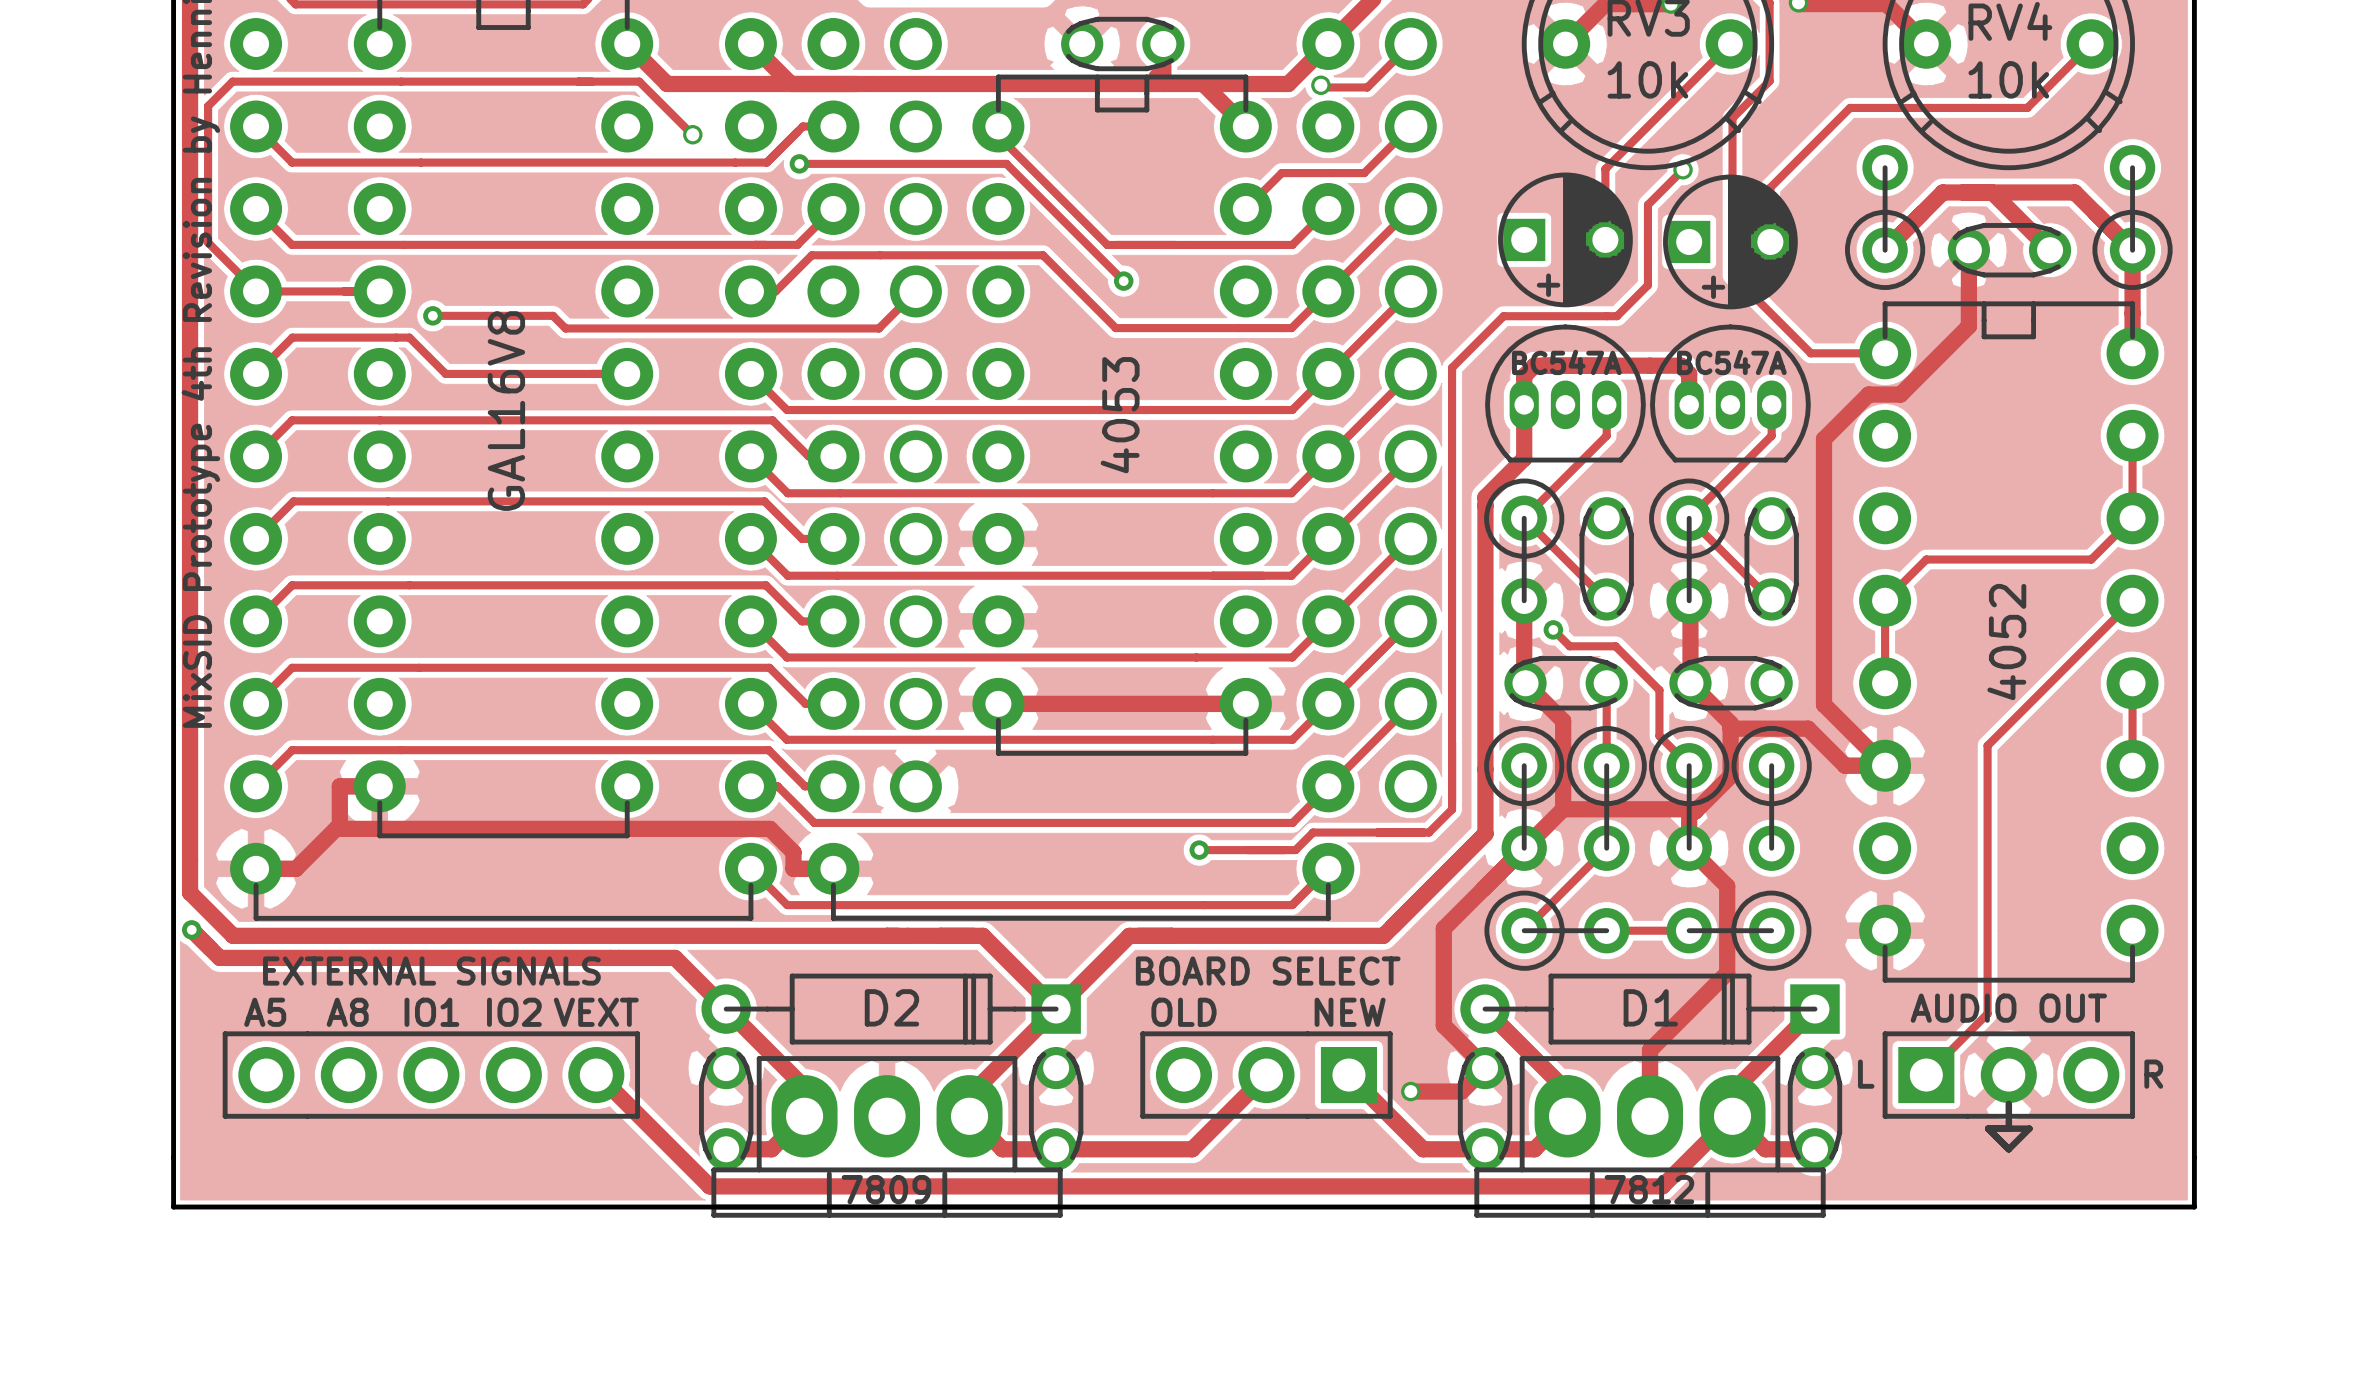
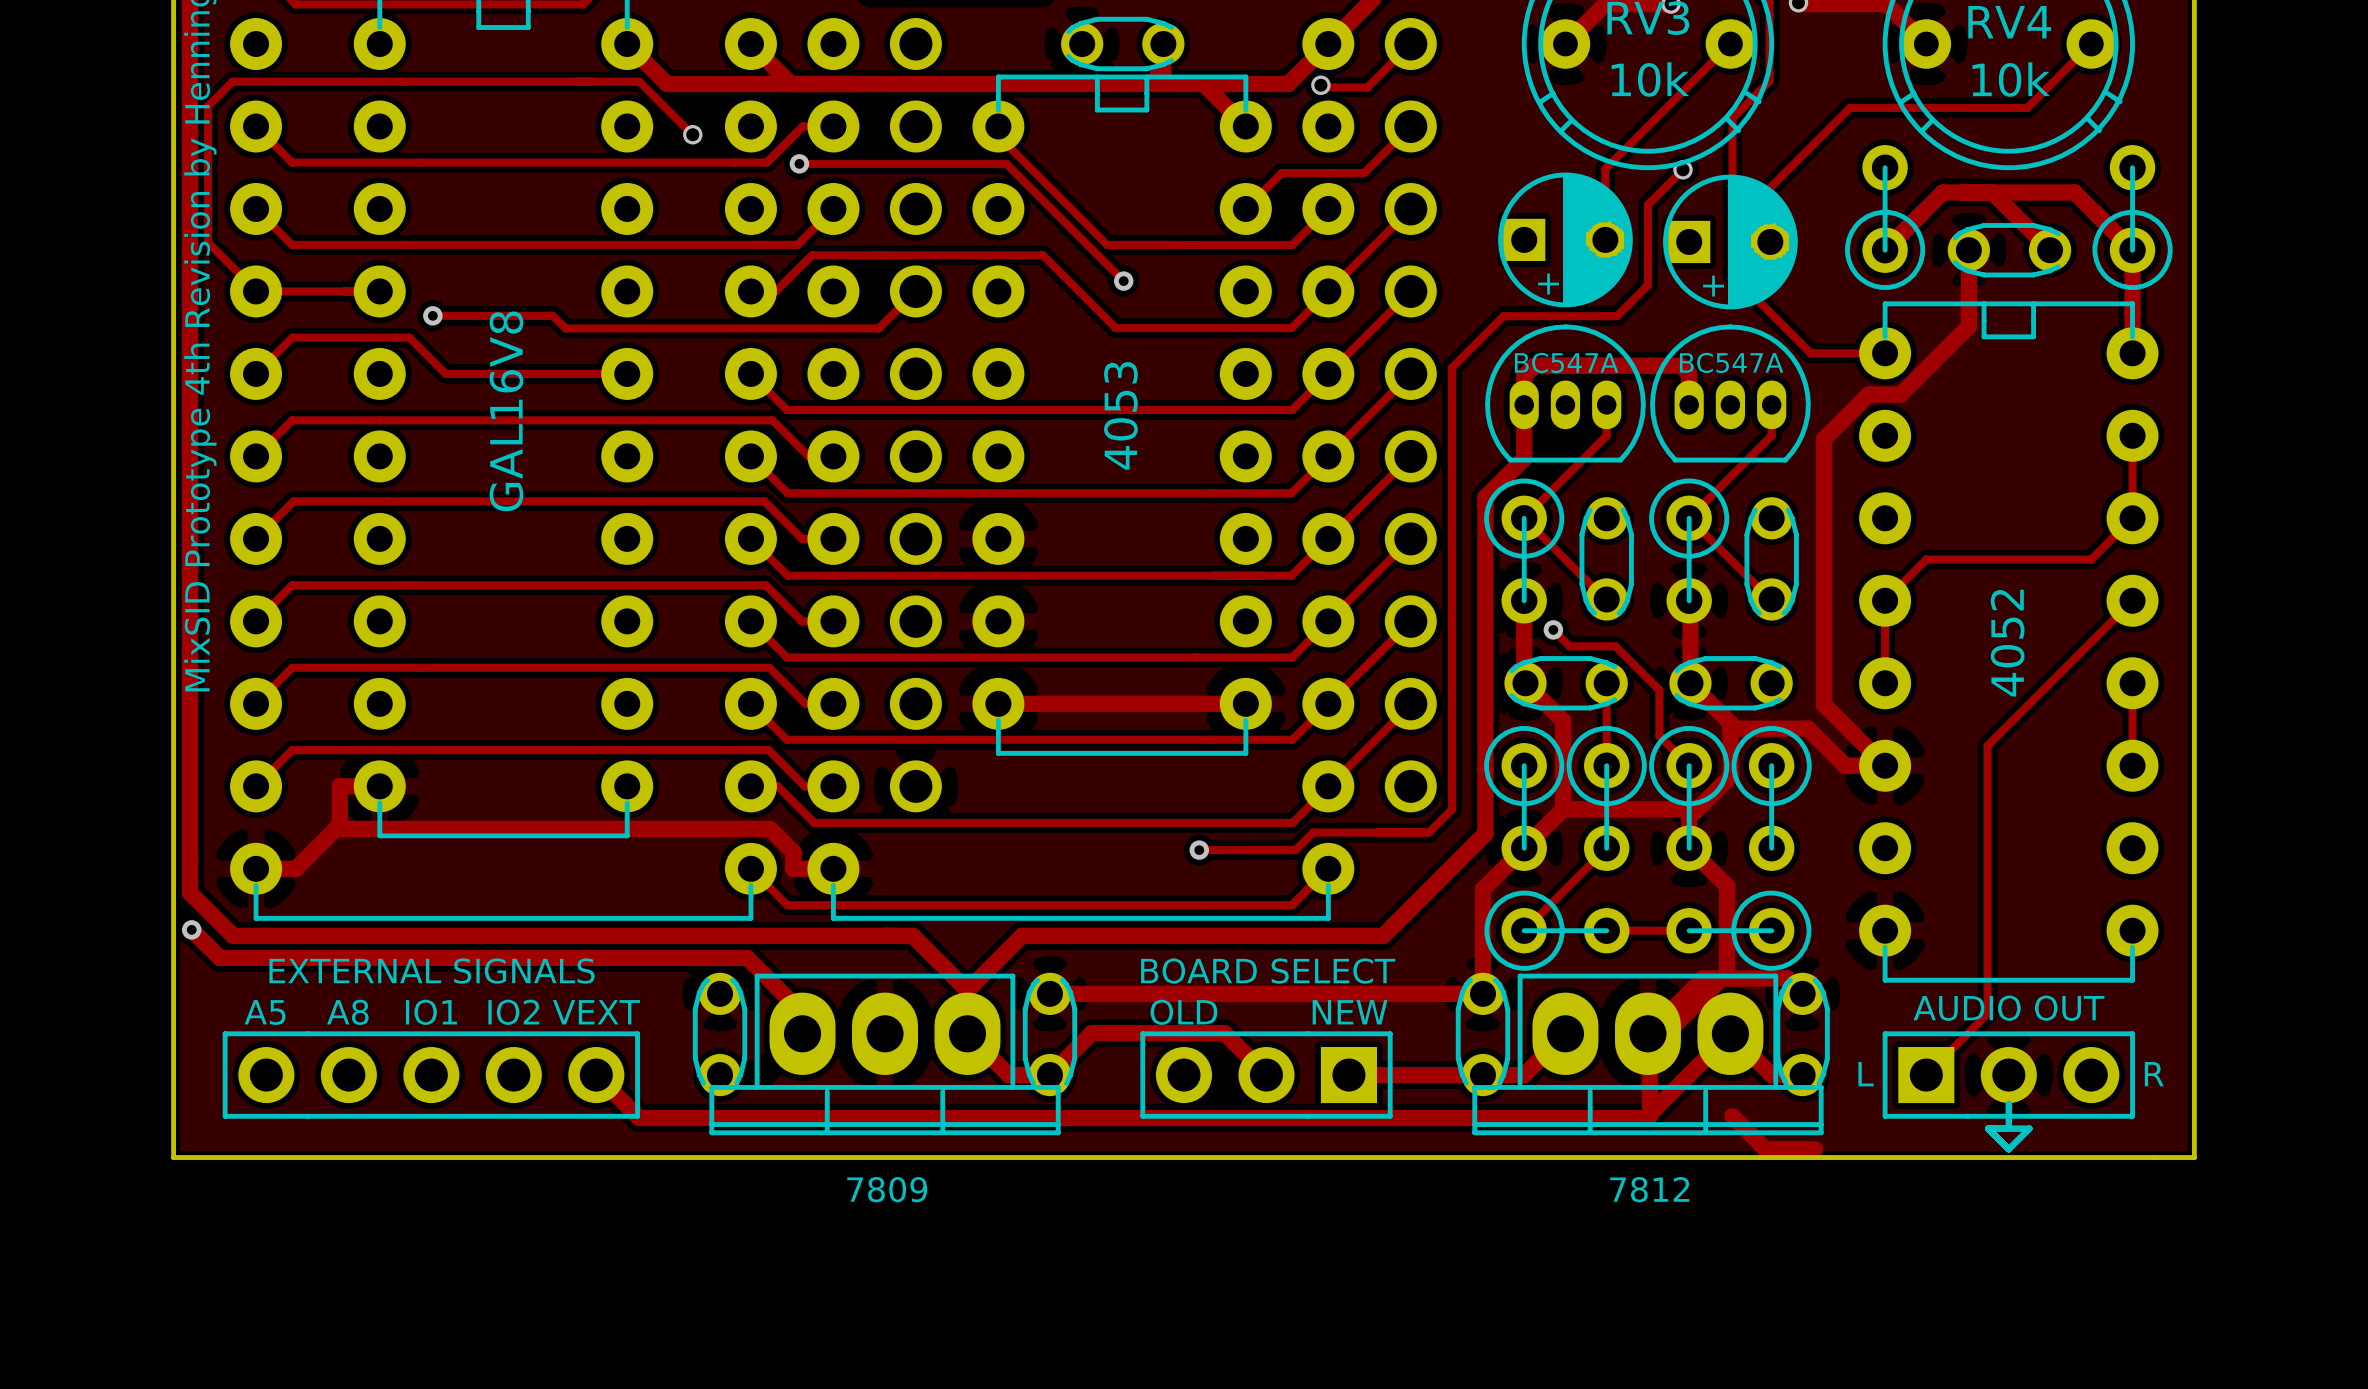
track: (1482, 889) (1443, 928) (1443, 1025) (1485, 1068) (1461, 1091) (1410, 1091) -> (1482, 889) (1482, 993) (1049, 993)
track: (912, 935) (982, 935) (1056, 1009) -> (912, 935) (967, 990)
track: (1129, 935) (969, 1095) -> (1129, 935) (1022, 935) (967, 990)
track: (675, 957) (804, 1087) (804, 1116) (771, 1149) (726, 1149) -> (675, 957) (747, 957) (802, 1013)
track: none -> (1802, 993) (1787, 978) (1703, 978) (1647, 1033)
track: none -> (985, 1008) (985, 1010)
D2: (891, 1009) -> none
track: (1485, 1009) (1567, 1091) -> none
D1: (1650, 1009) -> none
track: (1814, 1009) (1732, 1091) -> none
track: (596, 1075) (709, 1186) (1662, 1186) (1732, 1116) (1732, 1083) -> (596, 1075) (639, 1118) (1646, 1118) (1730, 1033) (1771, 1075) (1802, 1075)
track: (1266, 1075) (1192, 1149) (1002, 1149) (969, 1116) (969, 1087) -> (1266, 1075) (1224, 1033) (1091, 1033) (1049, 1075) (1008, 1075) (967, 1033) (967, 990)
track: (1348, 1075) (1423, 1149) (1534, 1149) (1567, 1116) (1567, 1083) -> (1348, 1075) (1524, 1075) (1565, 1033)
via: (1410, 1091) -> none
part position: (726, 1108) -> (720, 1034)
part position: (1056, 1108) -> (1049, 1034)
part position: (1485, 1108) -> (1482, 1034)
part position: (1814, 1108) -> (1802, 1034)
part position: (887, 1136) -> (885, 1054)
part position: (1650, 1136) -> (1647, 1054)
board edge: (173, 1157) (173, 1207) (2194, 1207) (2194, 1157) -> (173, 1157) (2194, 1157)

